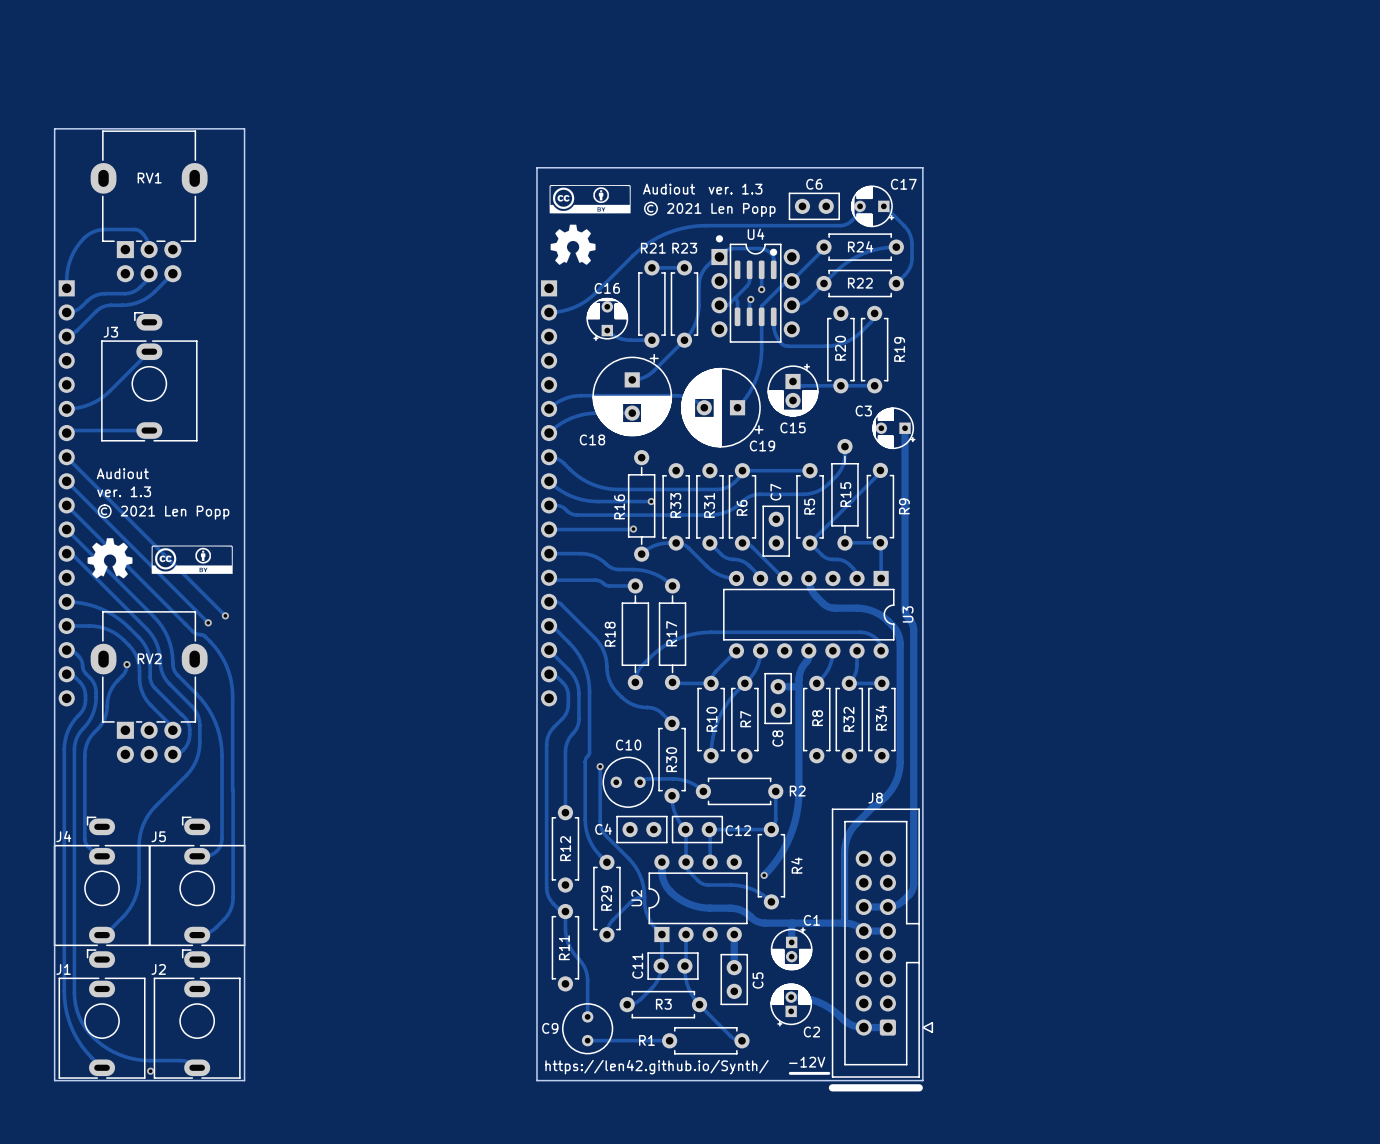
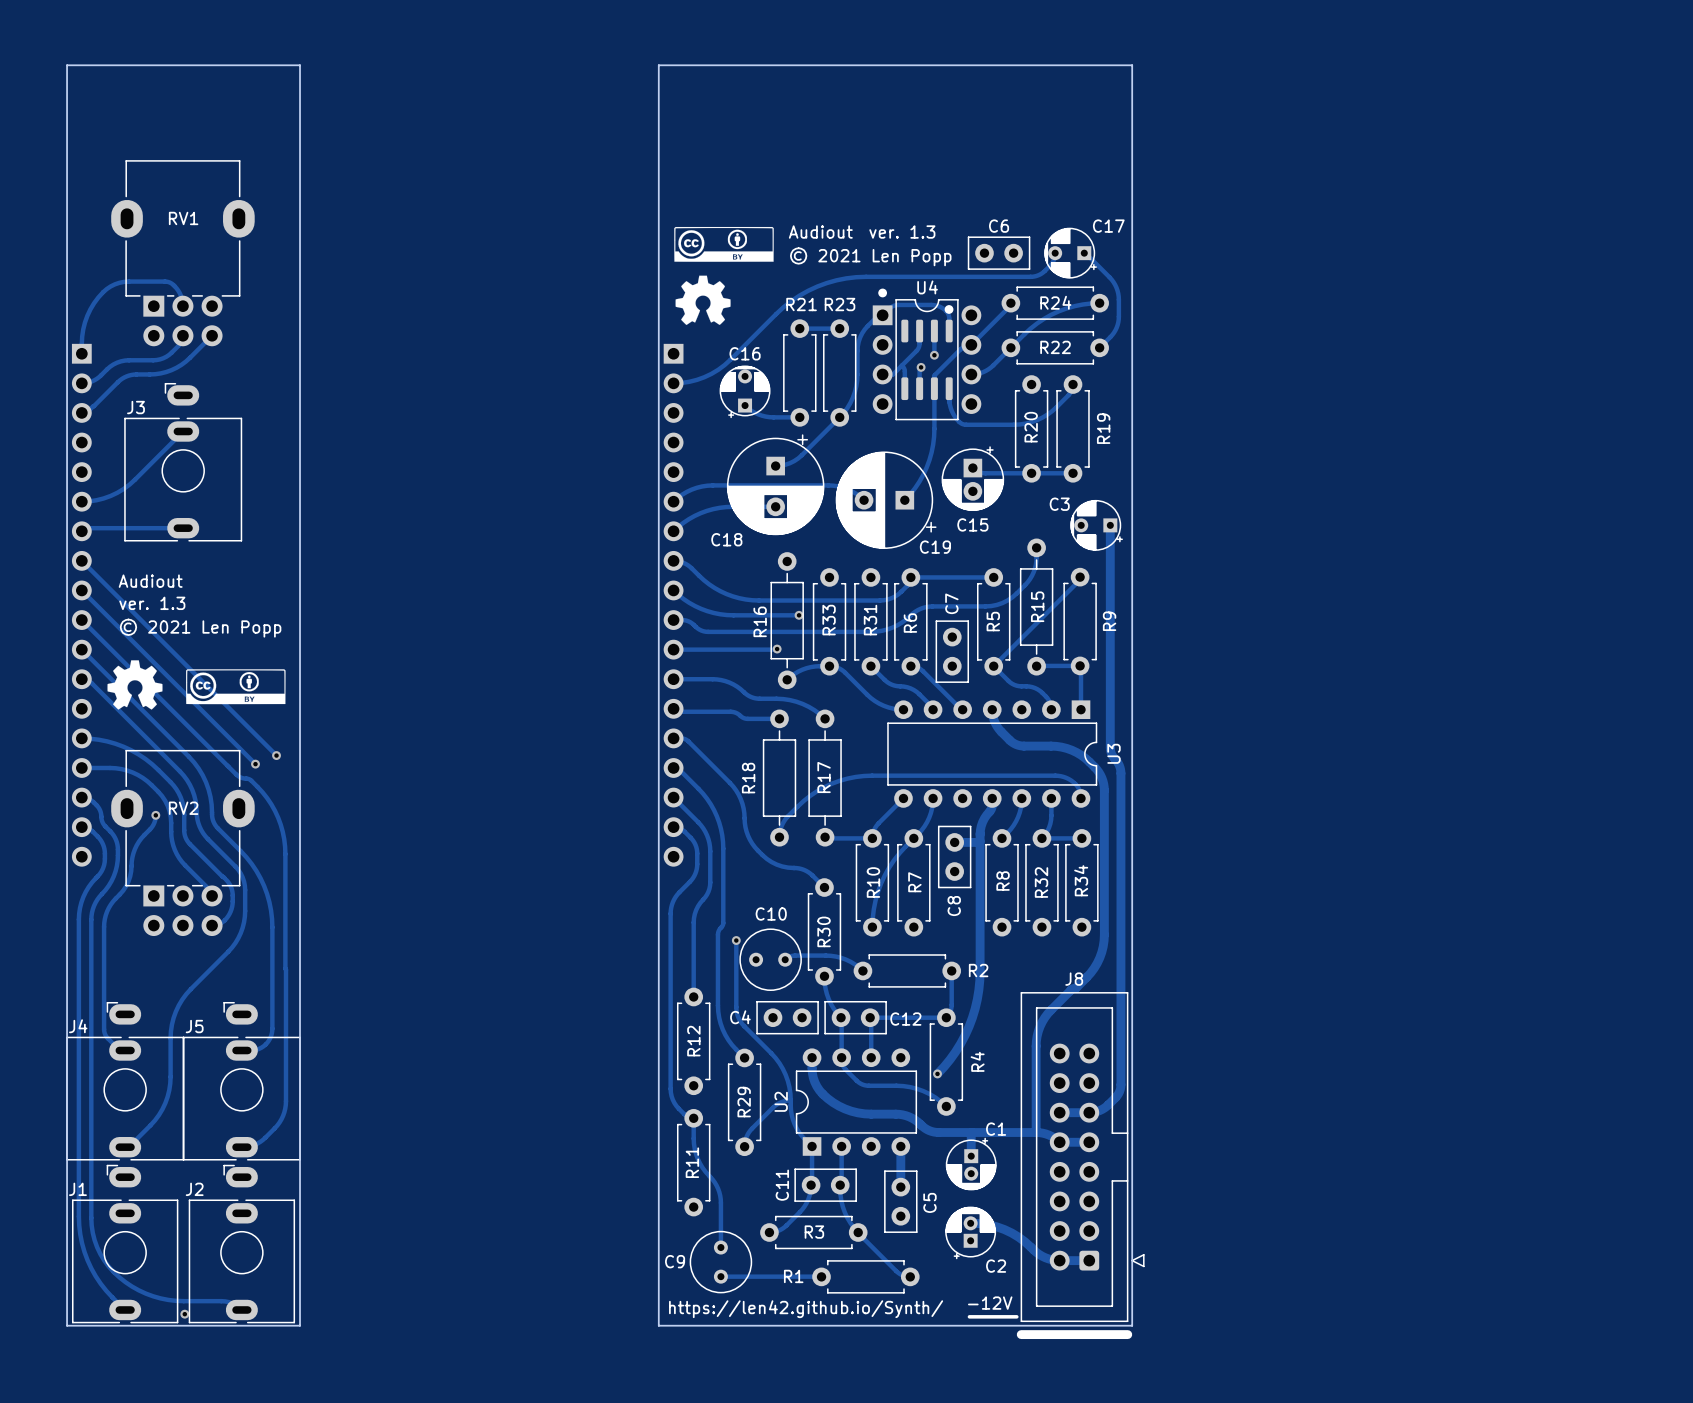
board edge: (54, 128) (244, 128) -> (67, 158) (67, 65) (300, 65) (300, 158)
board edge: (536, 167) (922, 167) -> (658, 205) (658, 65) (1132, 65) (1132, 205)

